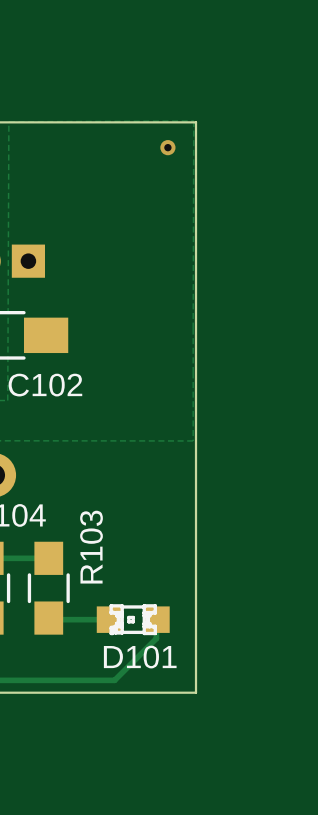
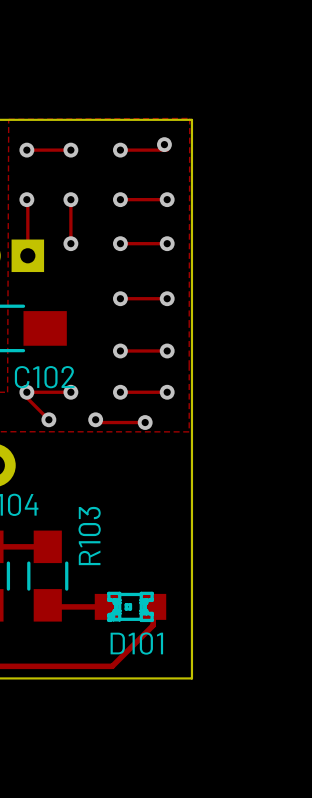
track: none -> (26, 150) (70, 150)
via: none -> (26, 150)
via: none -> (70, 150)
track: none -> (120, 150) (167, 150)
via: none -> (120, 150)
track: none -> (26, 199) (27, 255)
via: none -> (26, 199)
track: none -> (70, 199) (70, 243)
via: none -> (70, 199)
track: none -> (120, 199) (167, 199)
via: none -> (120, 199)
via: none -> (167, 199)
via: none -> (70, 243)
track: none -> (120, 243) (167, 243)
via: none -> (120, 243)
via: none -> (167, 243)
track: none -> (120, 298) (167, 298)
via: none -> (120, 298)
via: none -> (167, 298)
track: none -> (120, 350) (167, 350)
via: none -> (120, 350)
via: none -> (167, 350)
via: none -> (26, 392)
track: none -> (70, 392) (26, 392) (26, 397) (48, 419)
via: none -> (70, 392)
track: none -> (120, 392) (167, 392)
via: none -> (120, 392)
via: none -> (167, 392)
via: none -> (48, 419)
track: none -> (95, 419) (98, 422) (145, 422)
via: none -> (95, 419)
via: none -> (145, 422)

